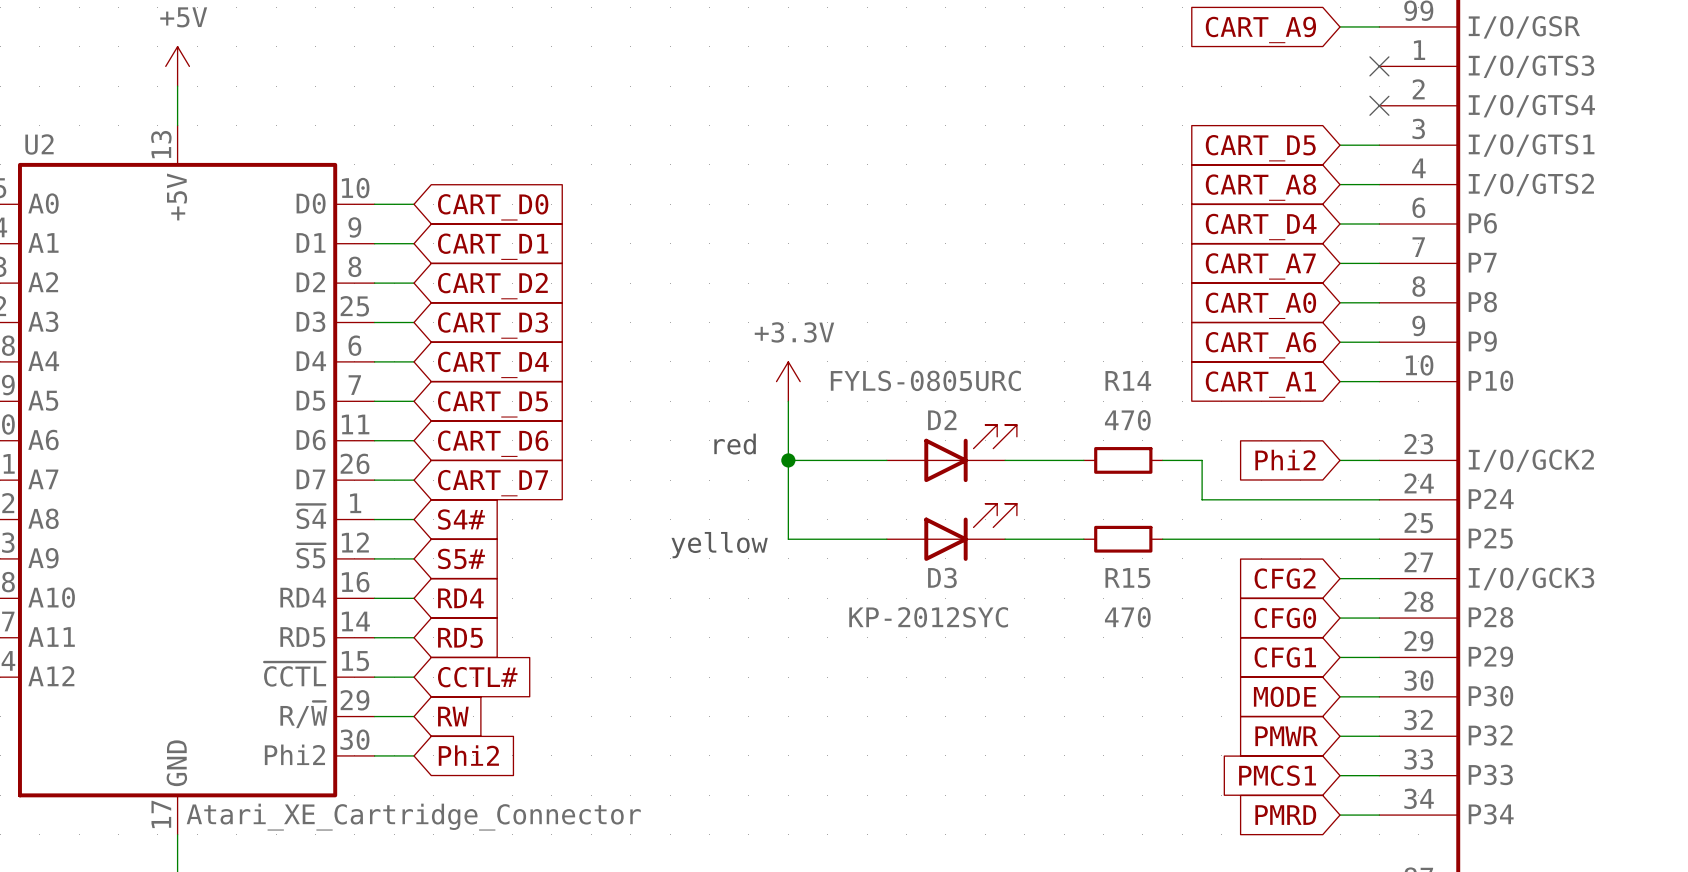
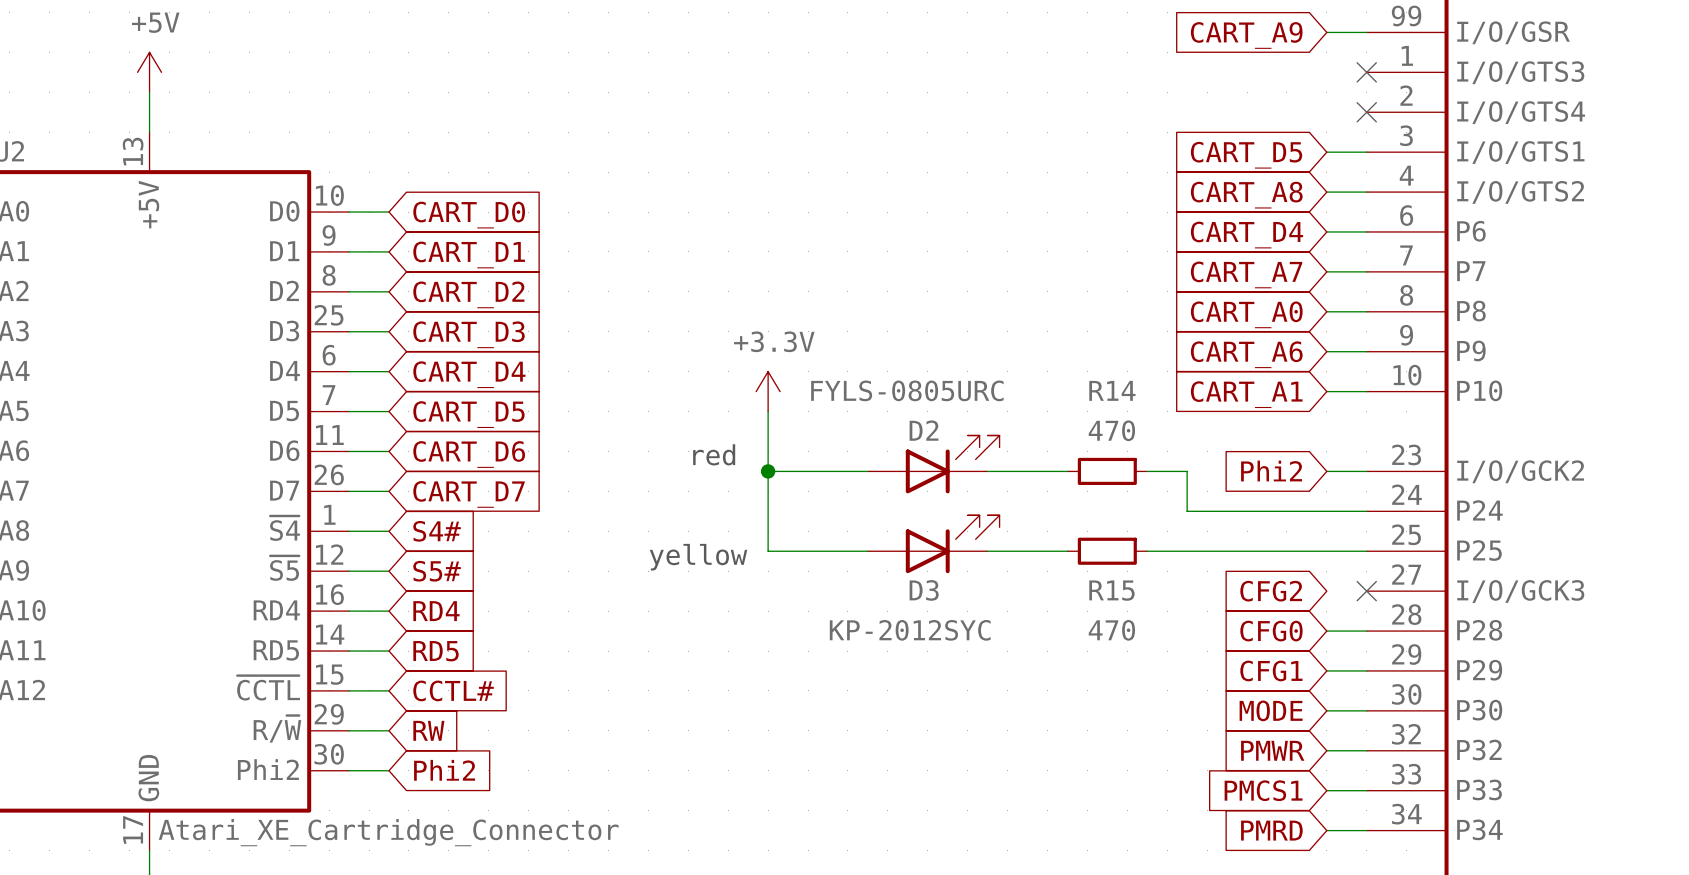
wire: (1340, 578) (1379, 578) -> none
no-connect mark: none -> (1366, 591)

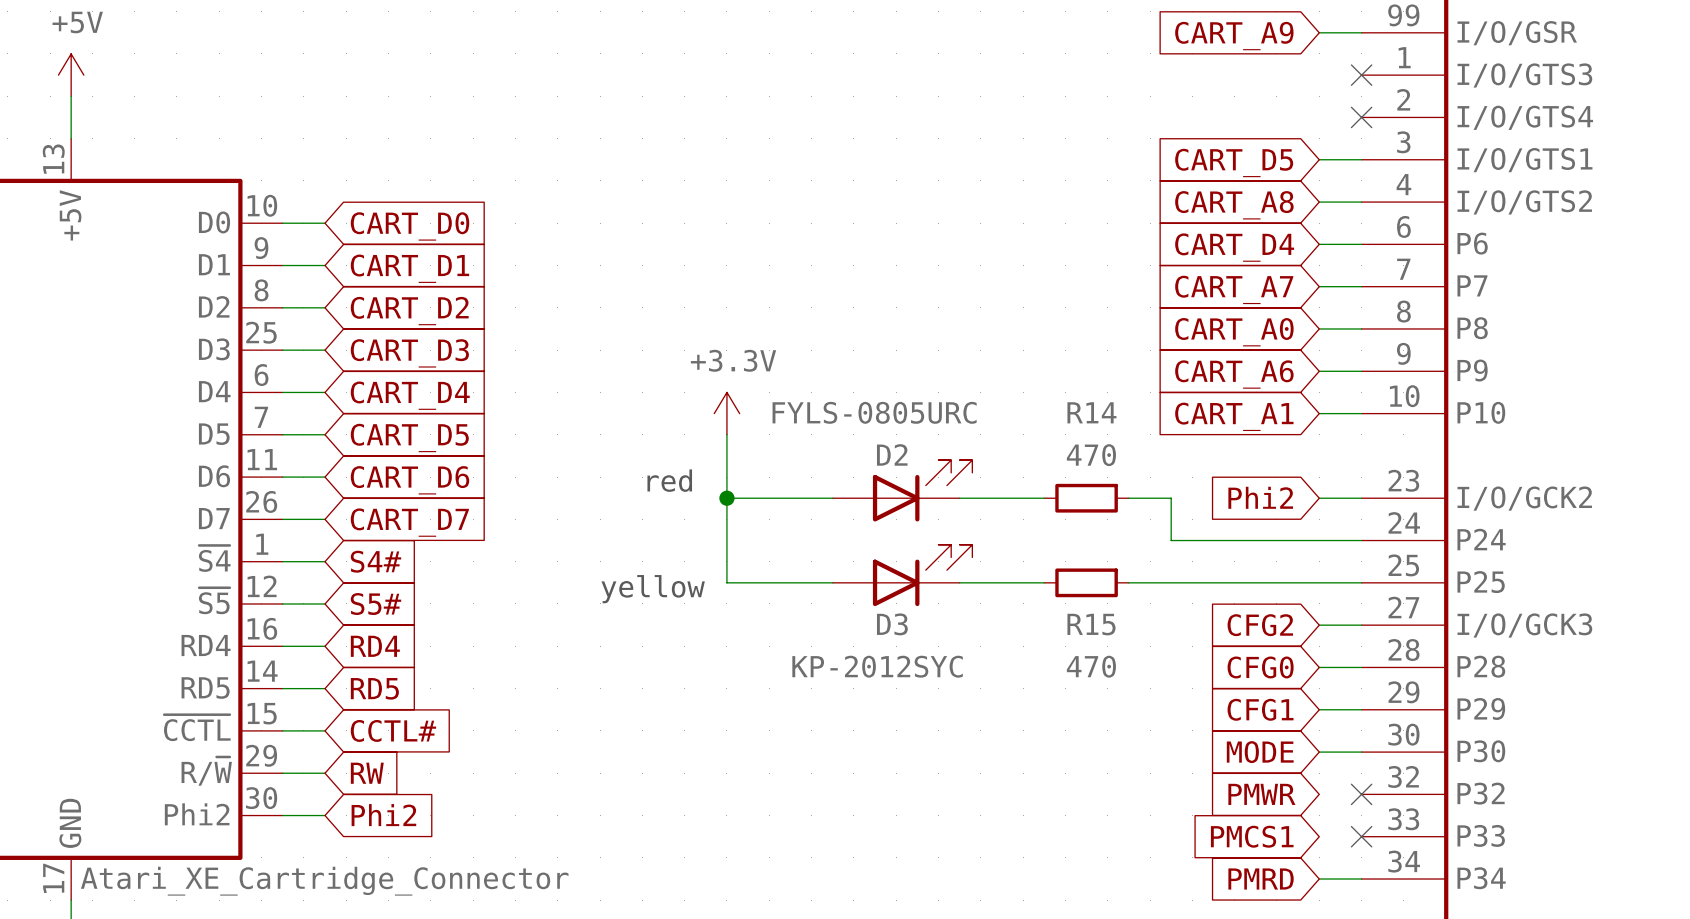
no-connect mark: (1366, 591) -> none
wire: (1326, 750) (1366, 750) -> (1319, 625) (1361, 625)
no-connect mark: none -> (1361, 794)
wire: (1326, 790) (1366, 790) -> none
no-connect mark: none -> (1361, 836)

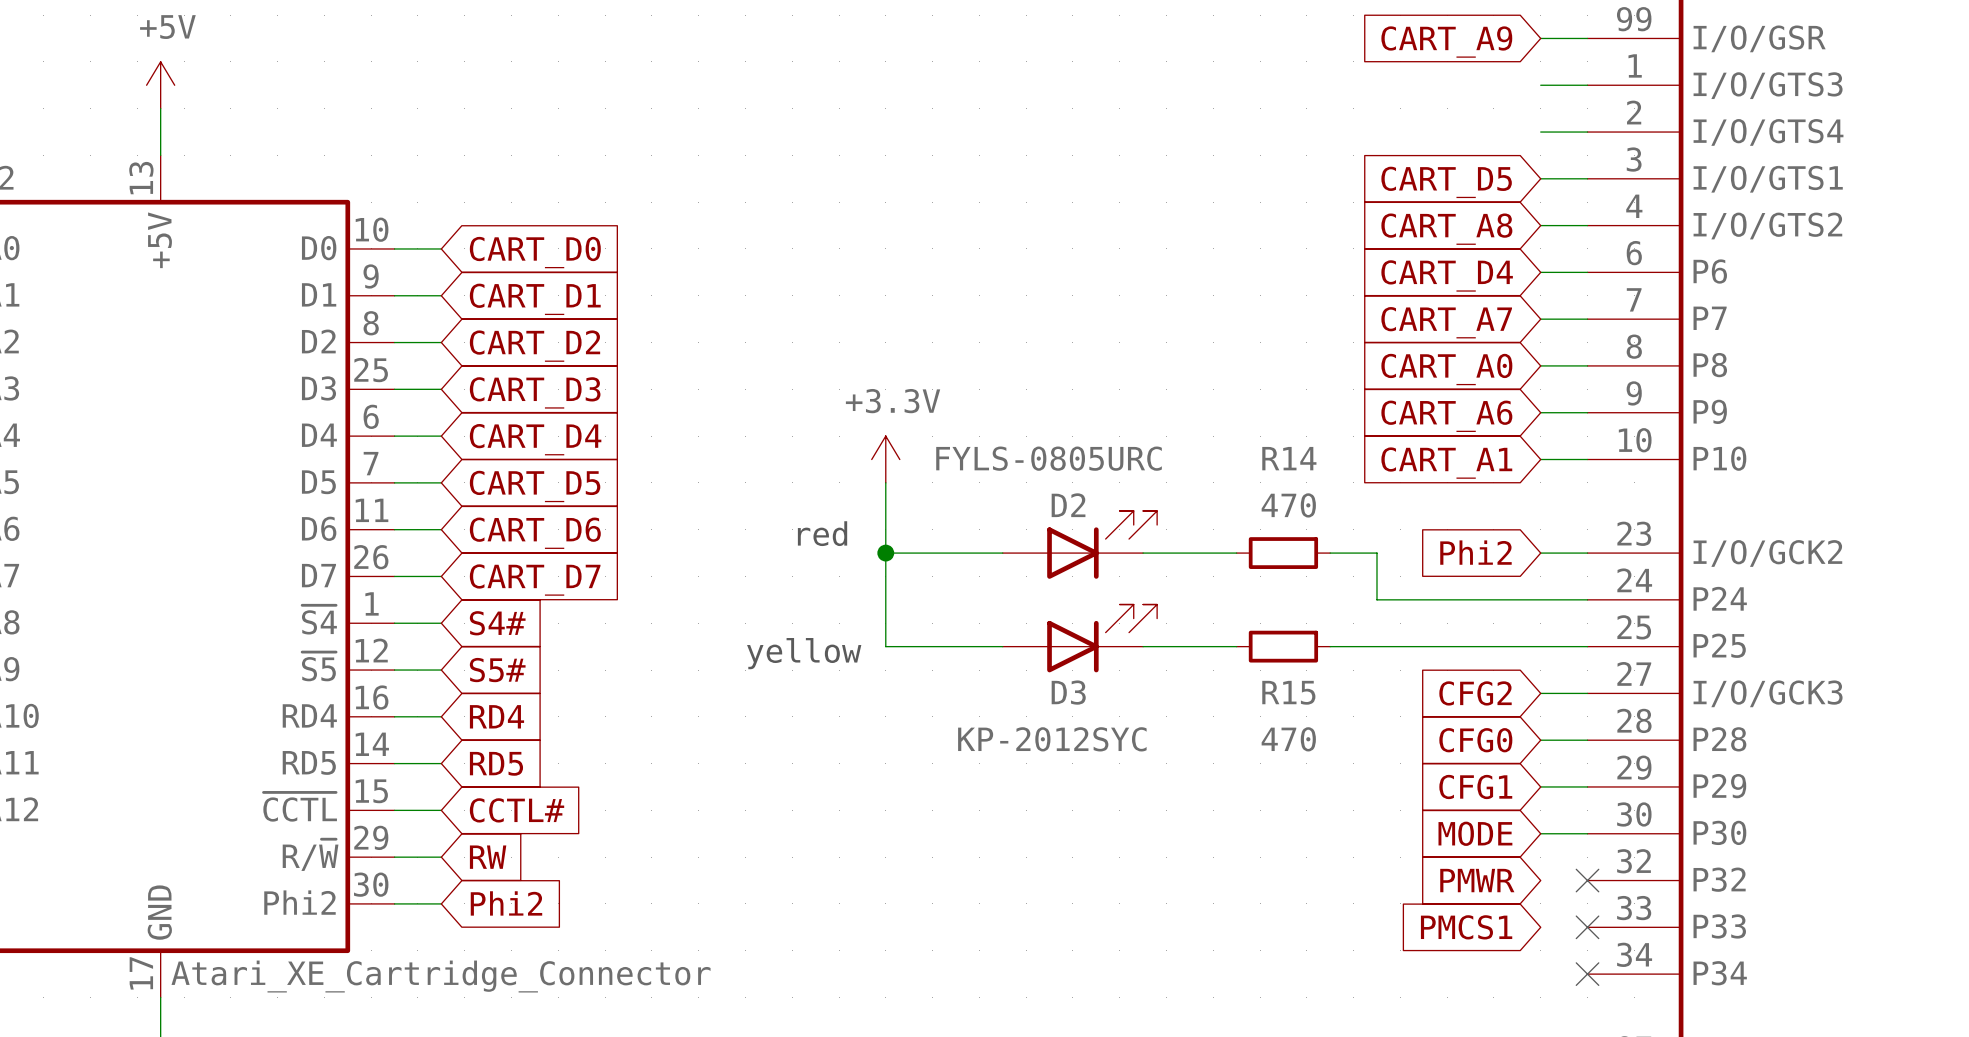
wire: none -> (1540, 85) (1587, 85)
no-connect mark: (1361, 75) -> none
wire: none -> (1540, 132) (1587, 132)
no-connect mark: (1361, 117) -> none
global label: PMRD (1261, 879) -> none
wire: (1319, 879) (1361, 879) -> none
no-connect mark: none -> (1587, 974)

